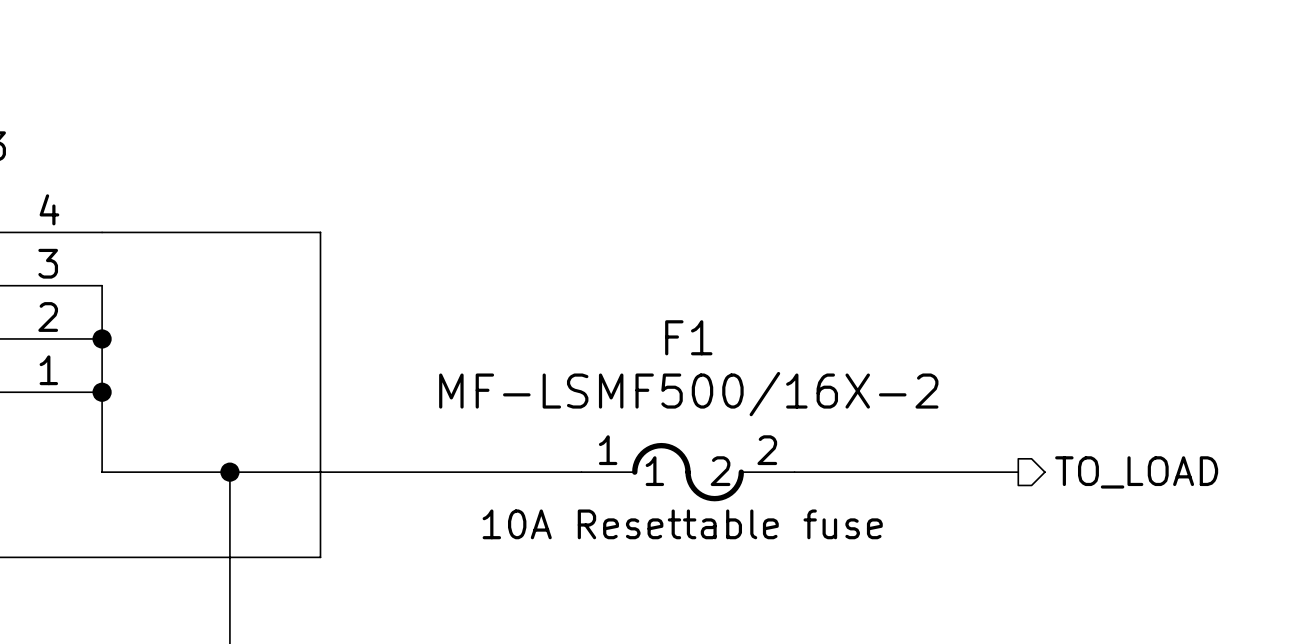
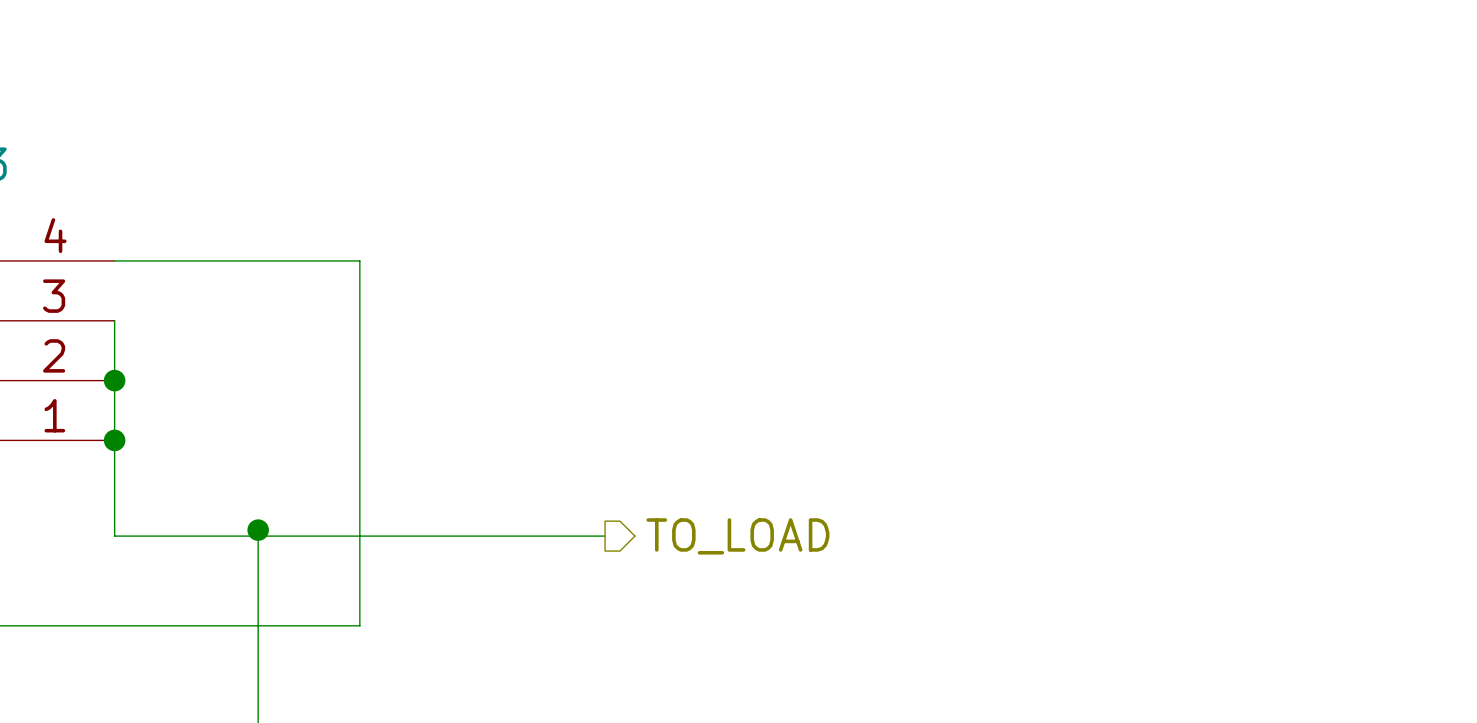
wire: (102, 472) (581, 472) -> (114, 530) (114, 536) (605, 536)
F1: MF-LSMF500/16X-2 (688, 472) -> none
wire: (794, 472) (1018, 472) -> none
hierarchical label position: TO_LOAD (1136, 472) -> TO_LOAD (737, 536)
text: 10A Resettable fuse (682, 524) -> none

